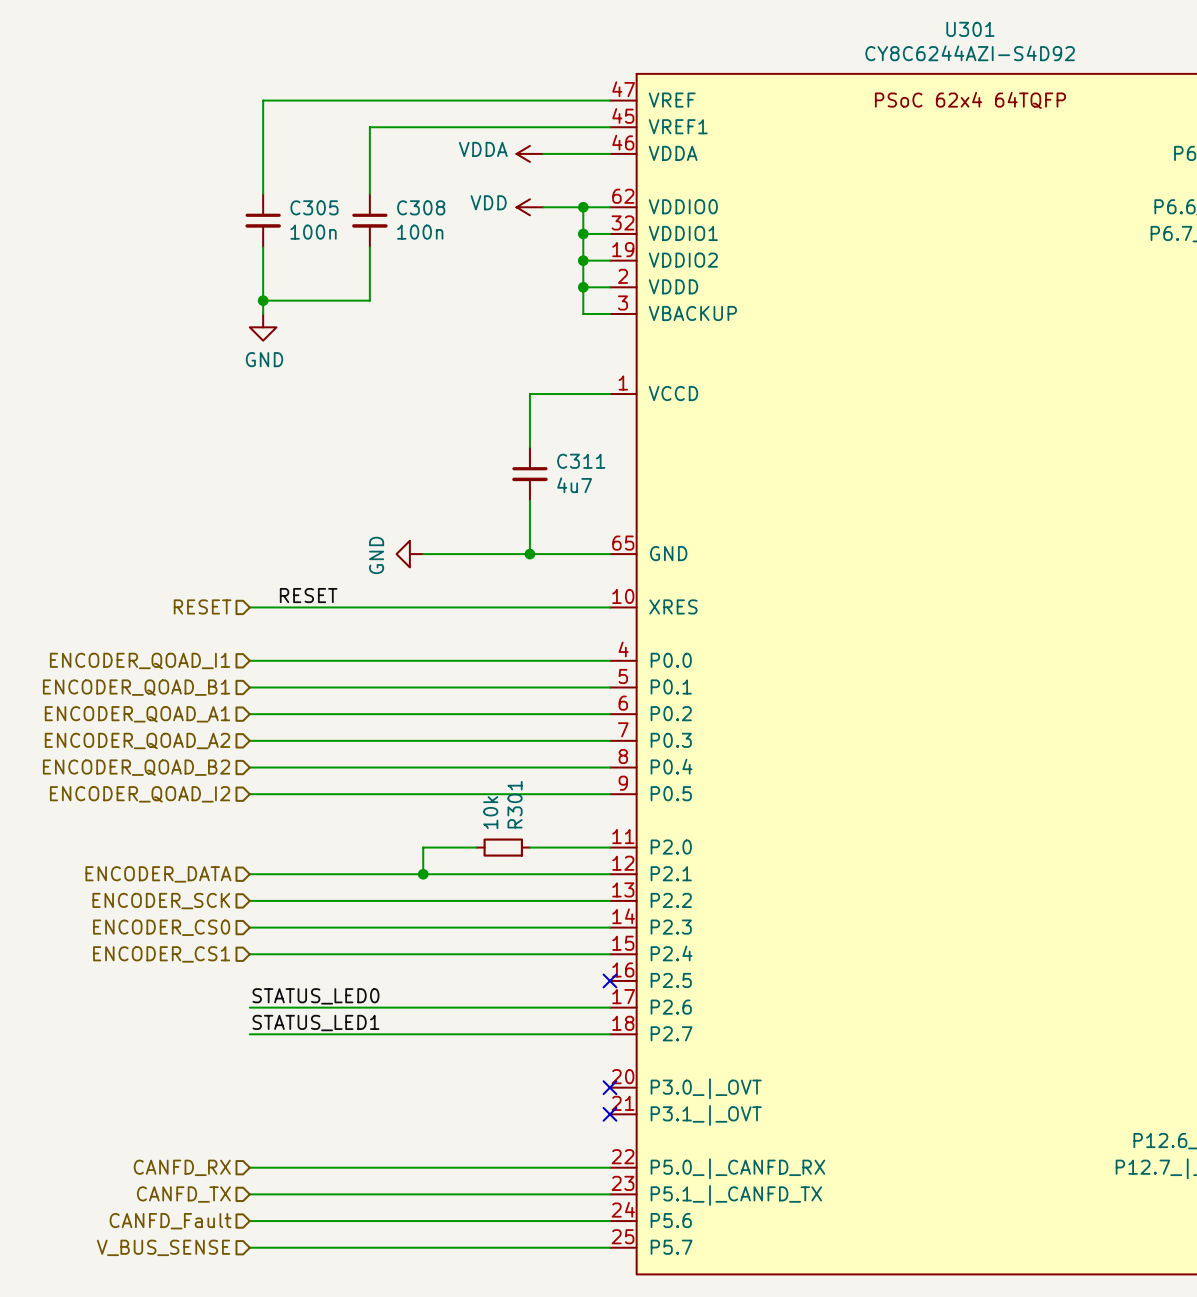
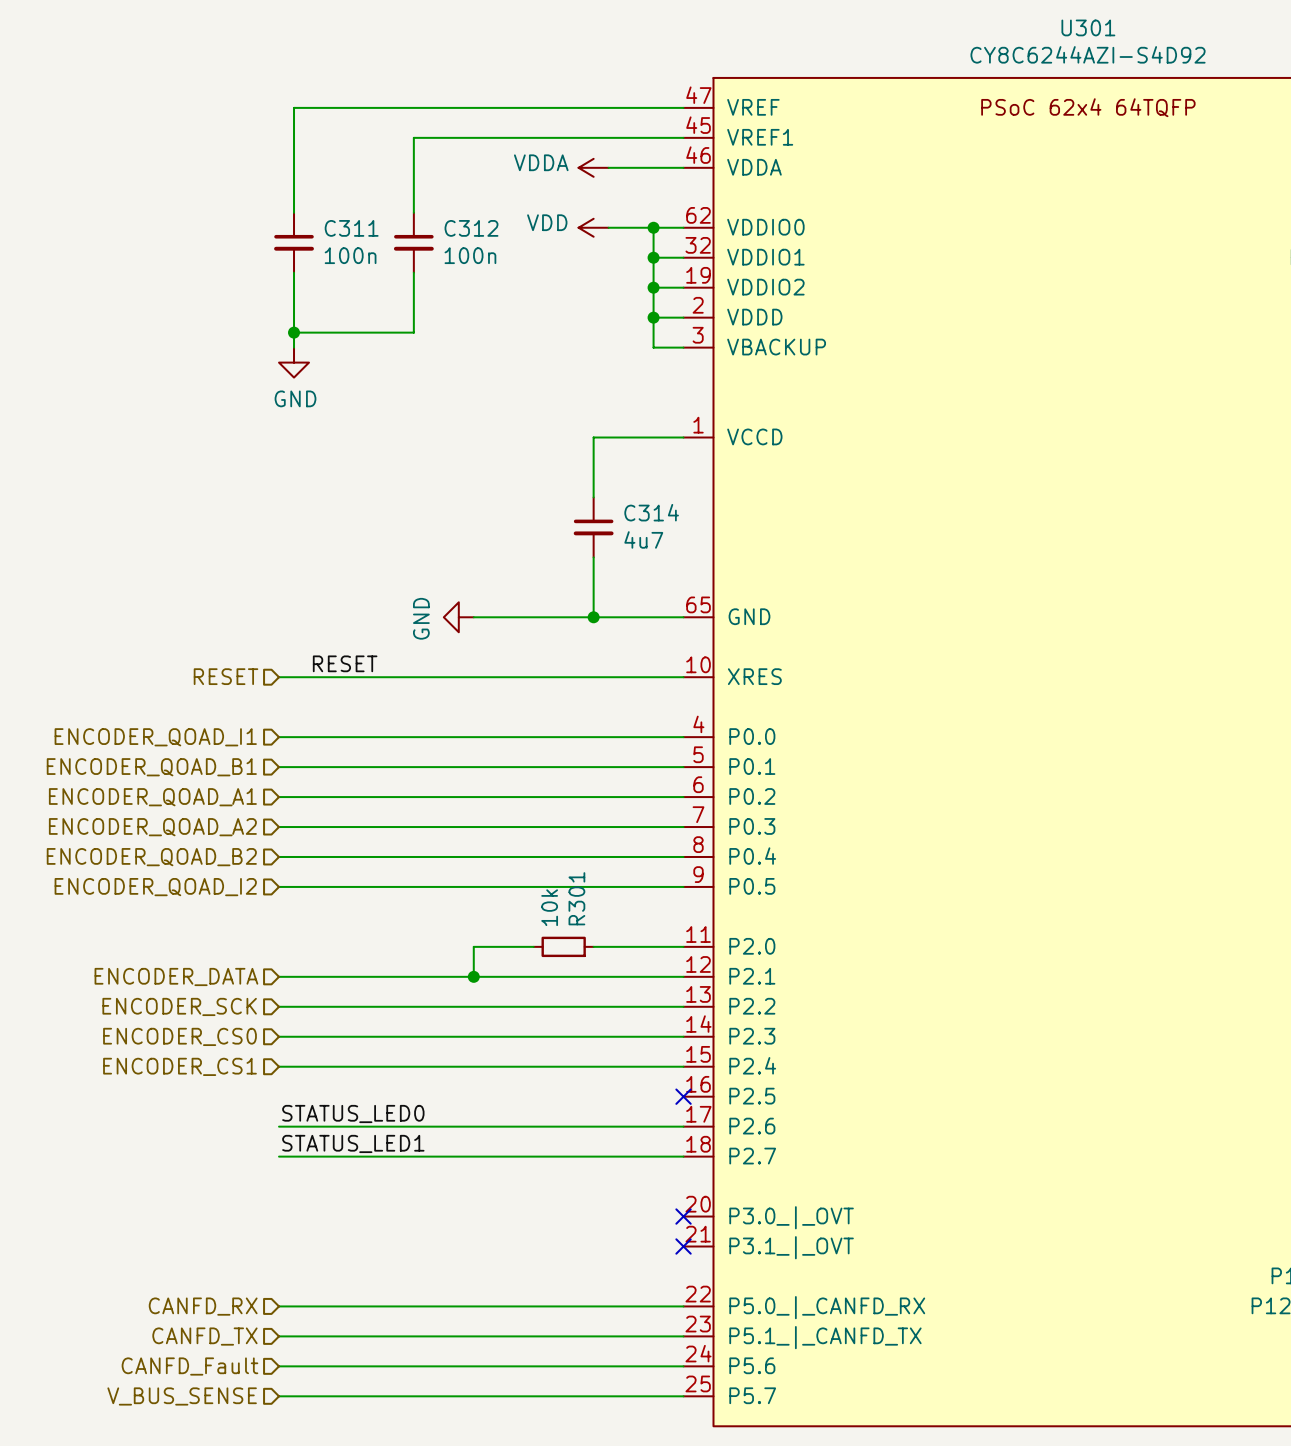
C305 name: C305 (314, 207) -> C311 (351, 228)
C308 name: C308 (421, 207) -> C312 (471, 228)
C311 name: C311 (581, 461) -> C314 (651, 512)

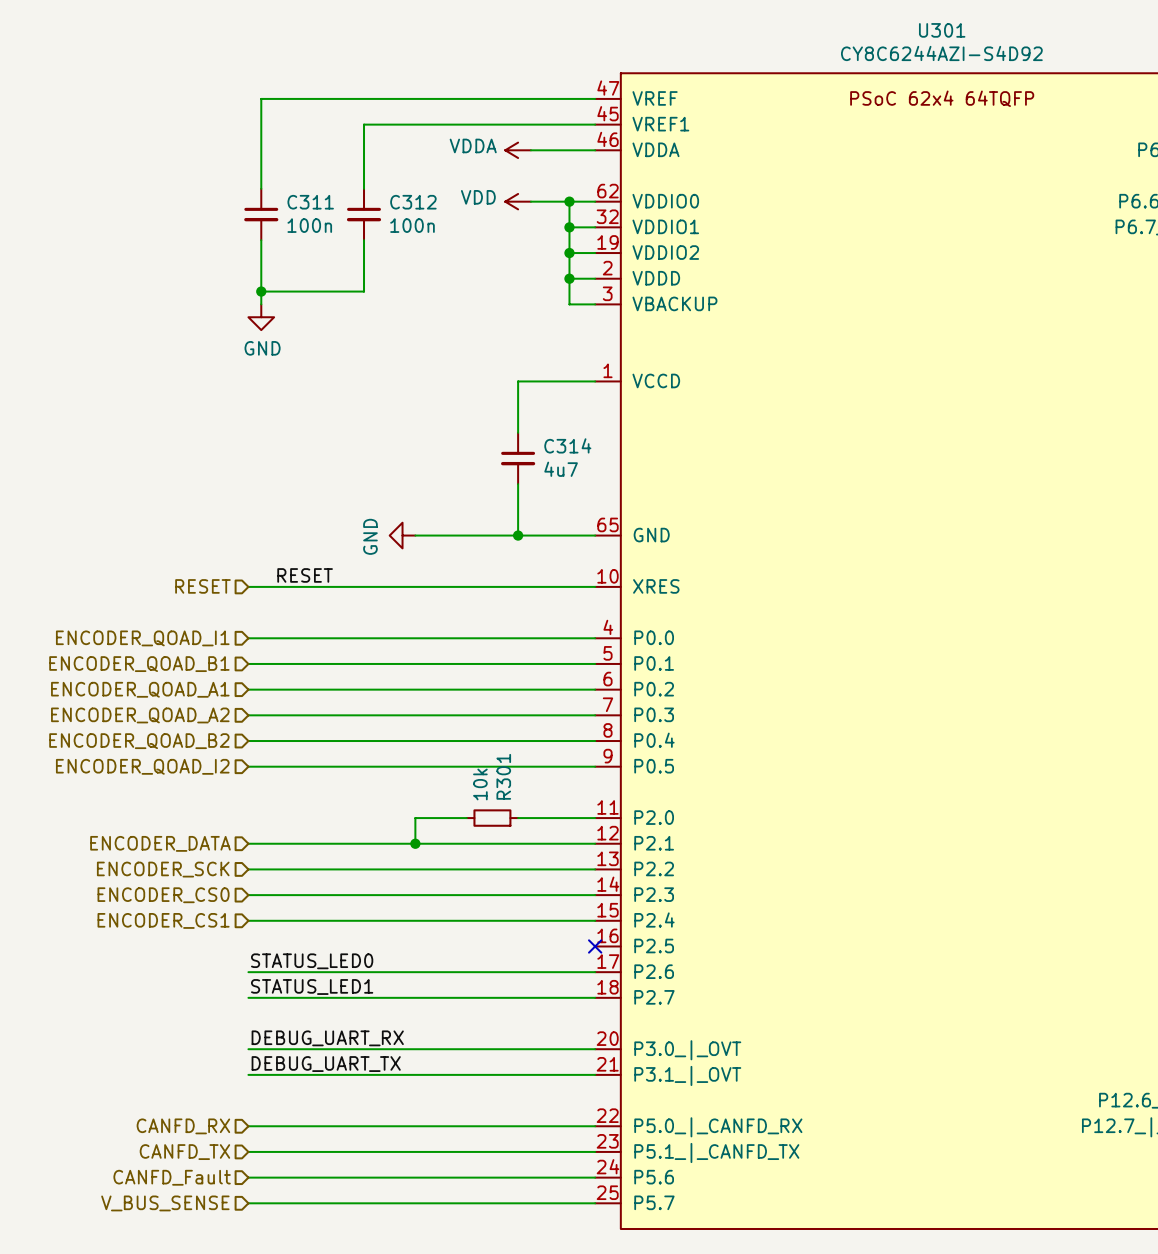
label: none -> DEBUG_UART_RX (327, 1038)
wire: none -> (248, 1049) (595, 1049)
no-connect mark: (683, 1216) -> none
label: none -> DEBUG_UART_TX (326, 1064)
wire: none -> (248, 1074) (595, 1074)
no-connect mark: (683, 1246) -> none

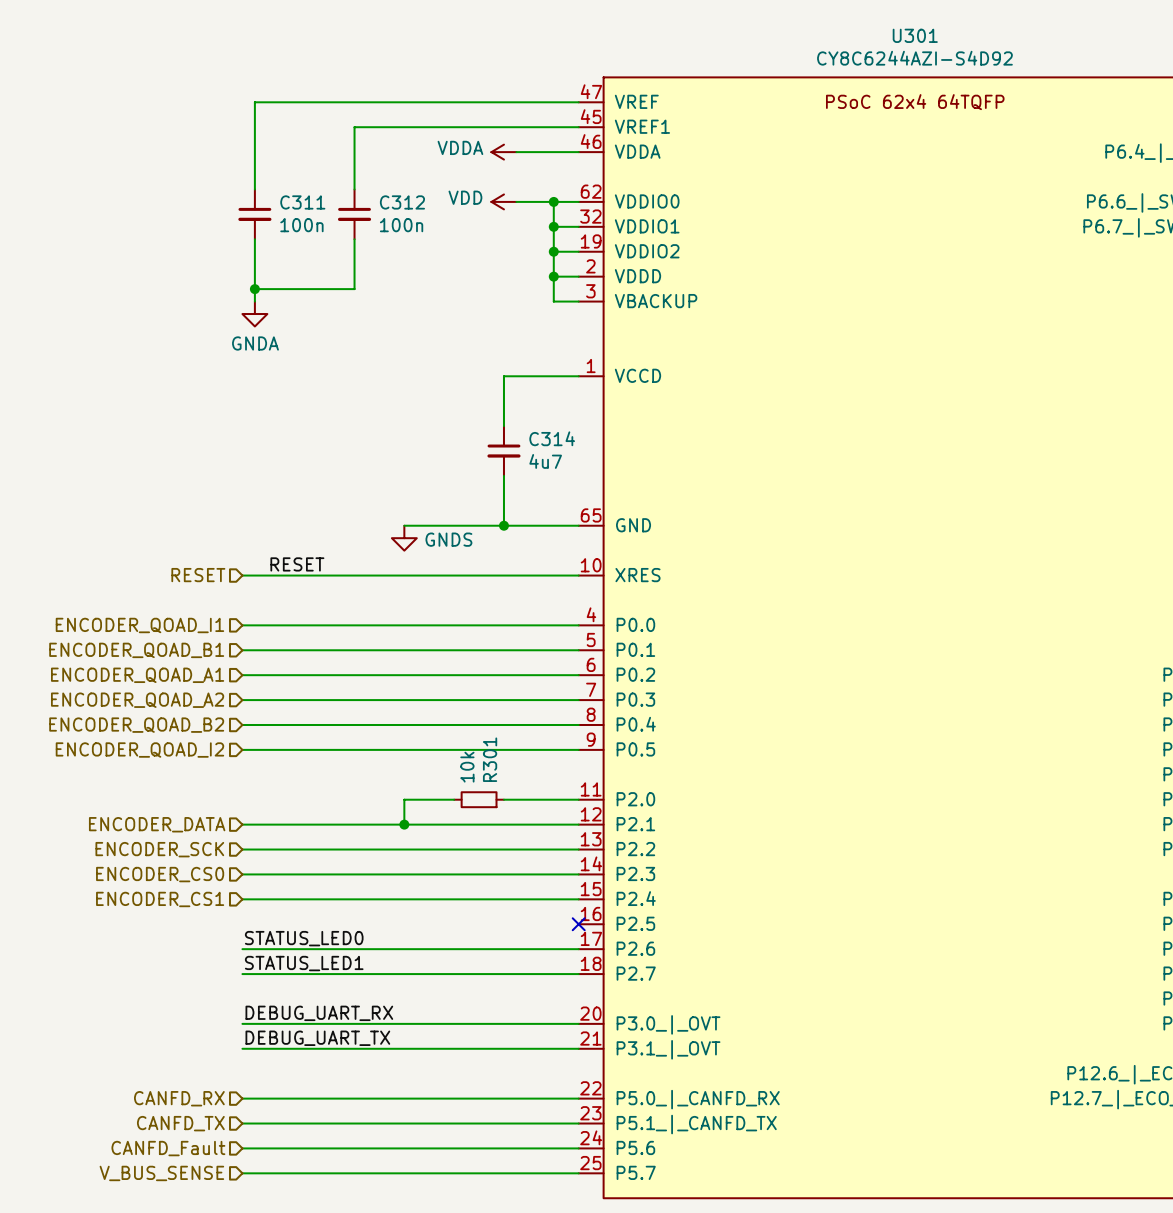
power symbol: GND (261, 317) -> GNDA (254, 314)
power symbol: GND (402, 535) -> none
power symbol: none -> GNDS (404, 538)

